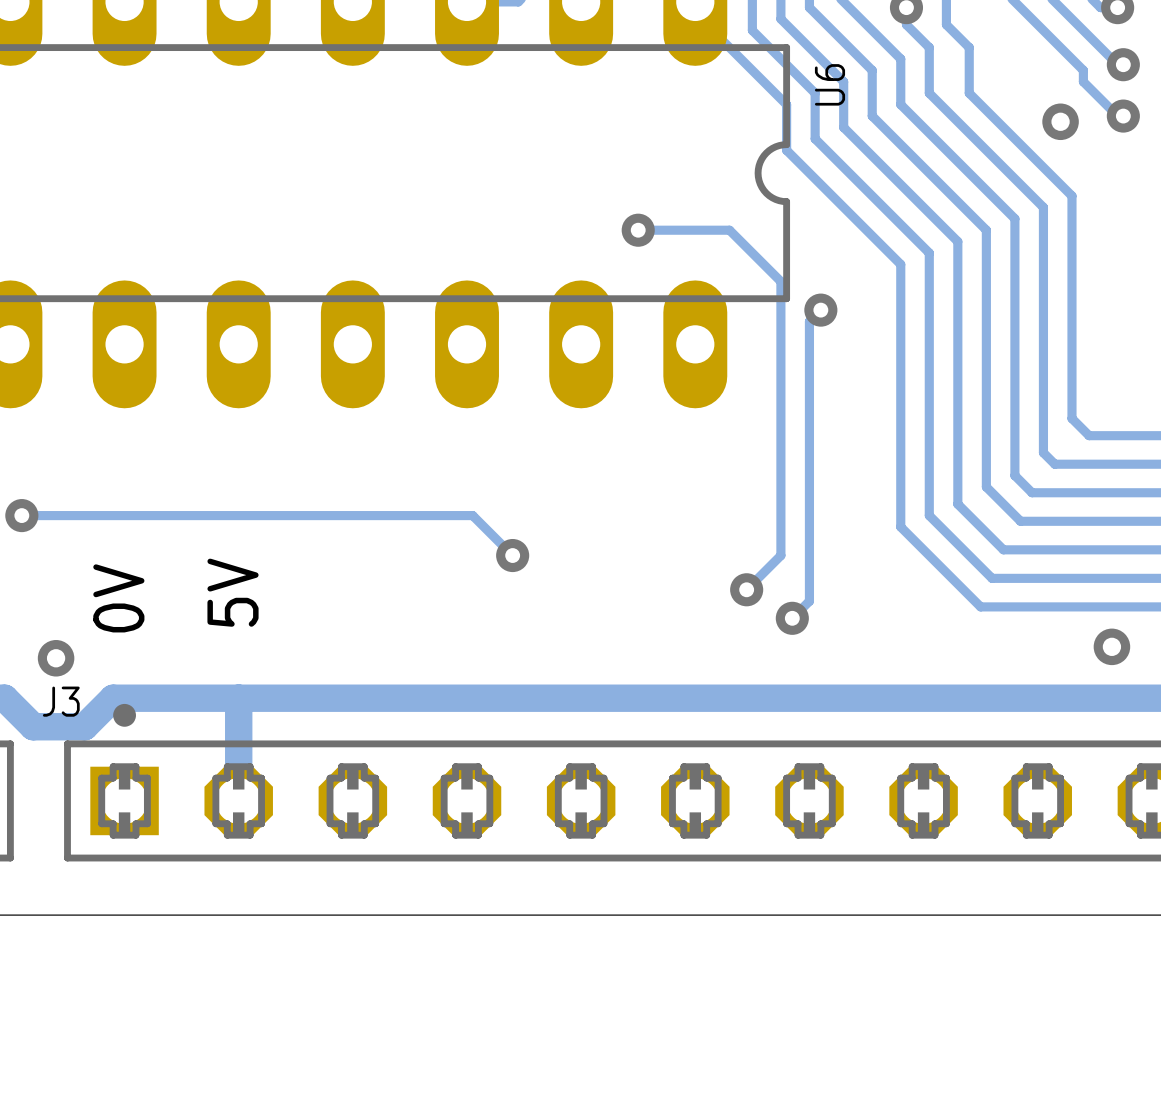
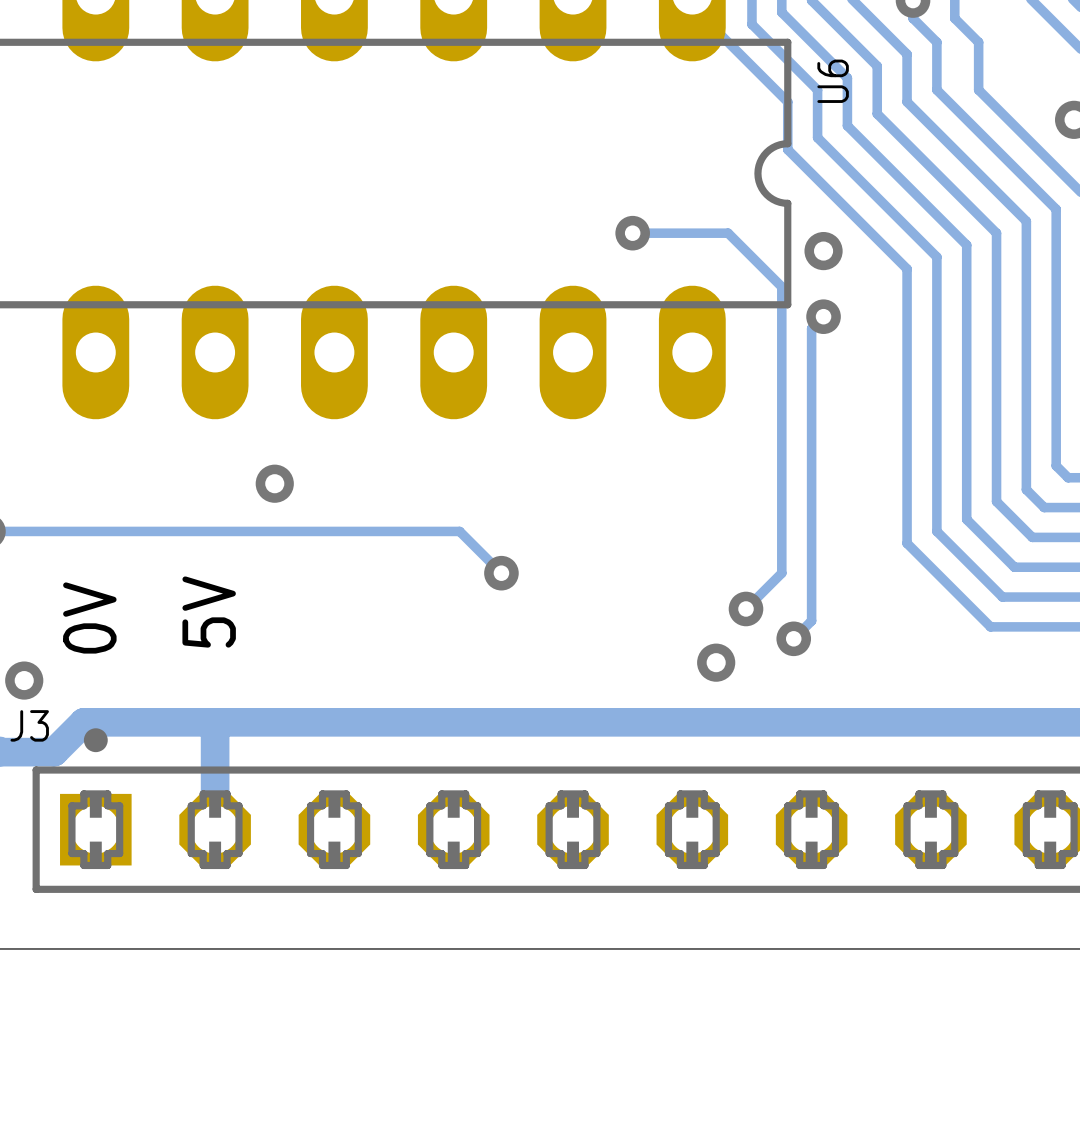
via: none -> (823, 251)
via: none -> (274, 483)
via: none -> (716, 662)

